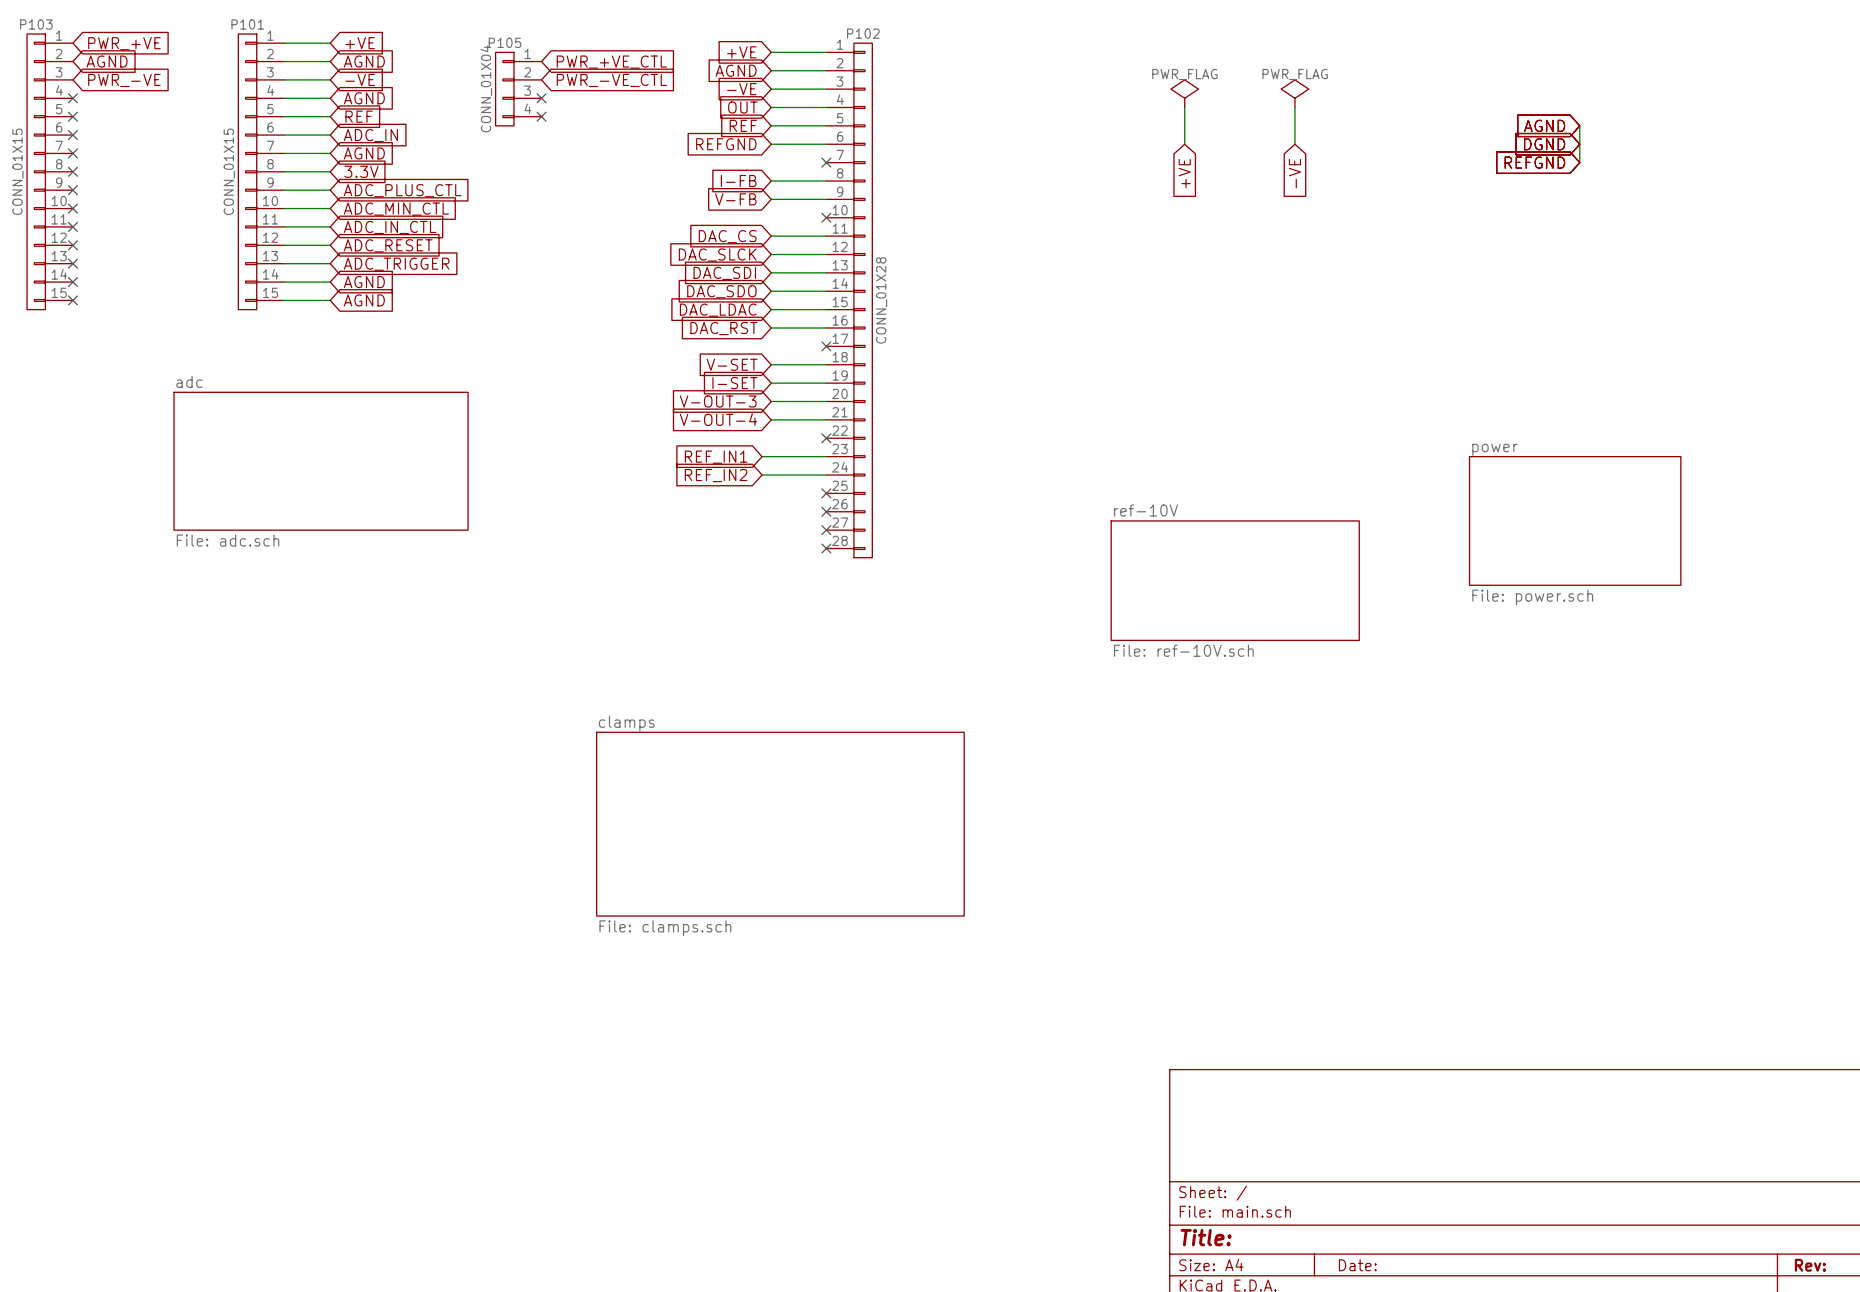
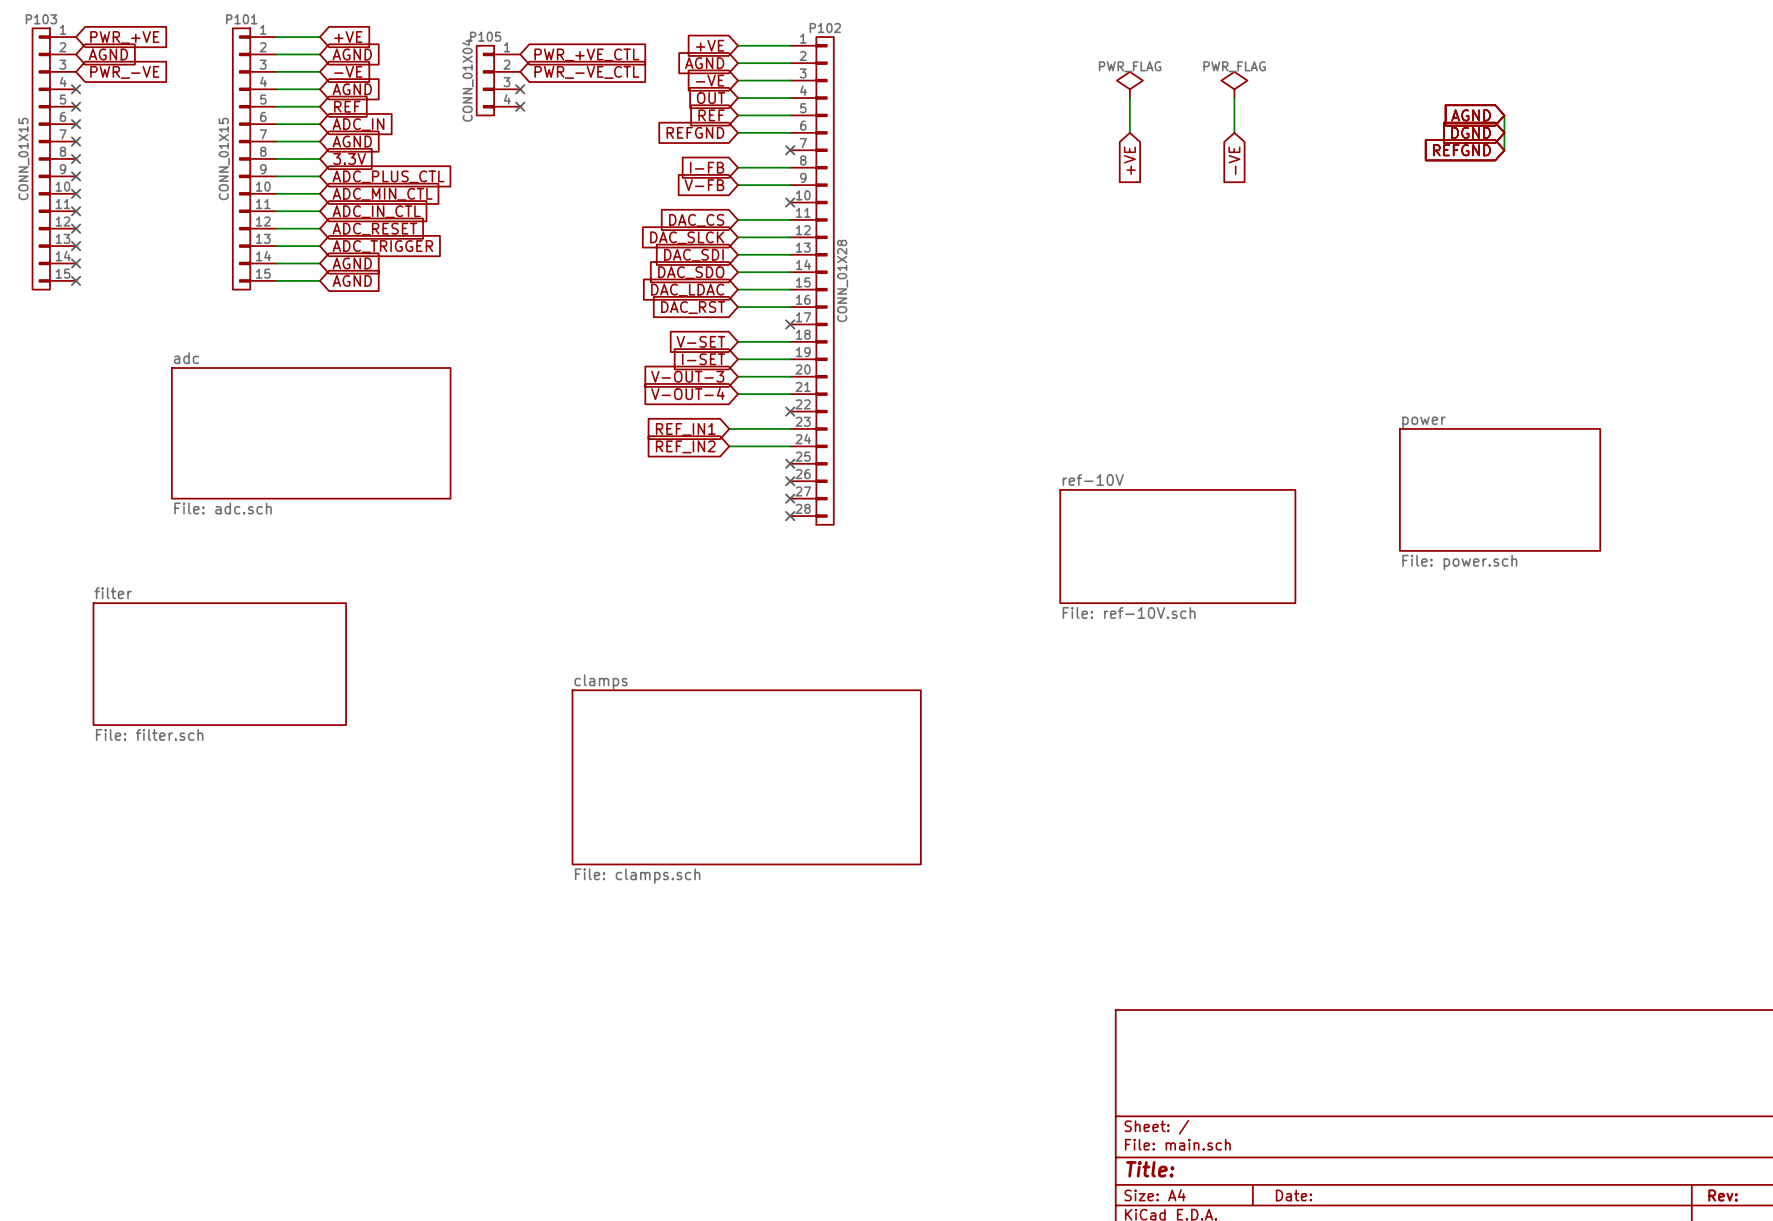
sheet filter: none -> File: filter.sch (219, 664)

